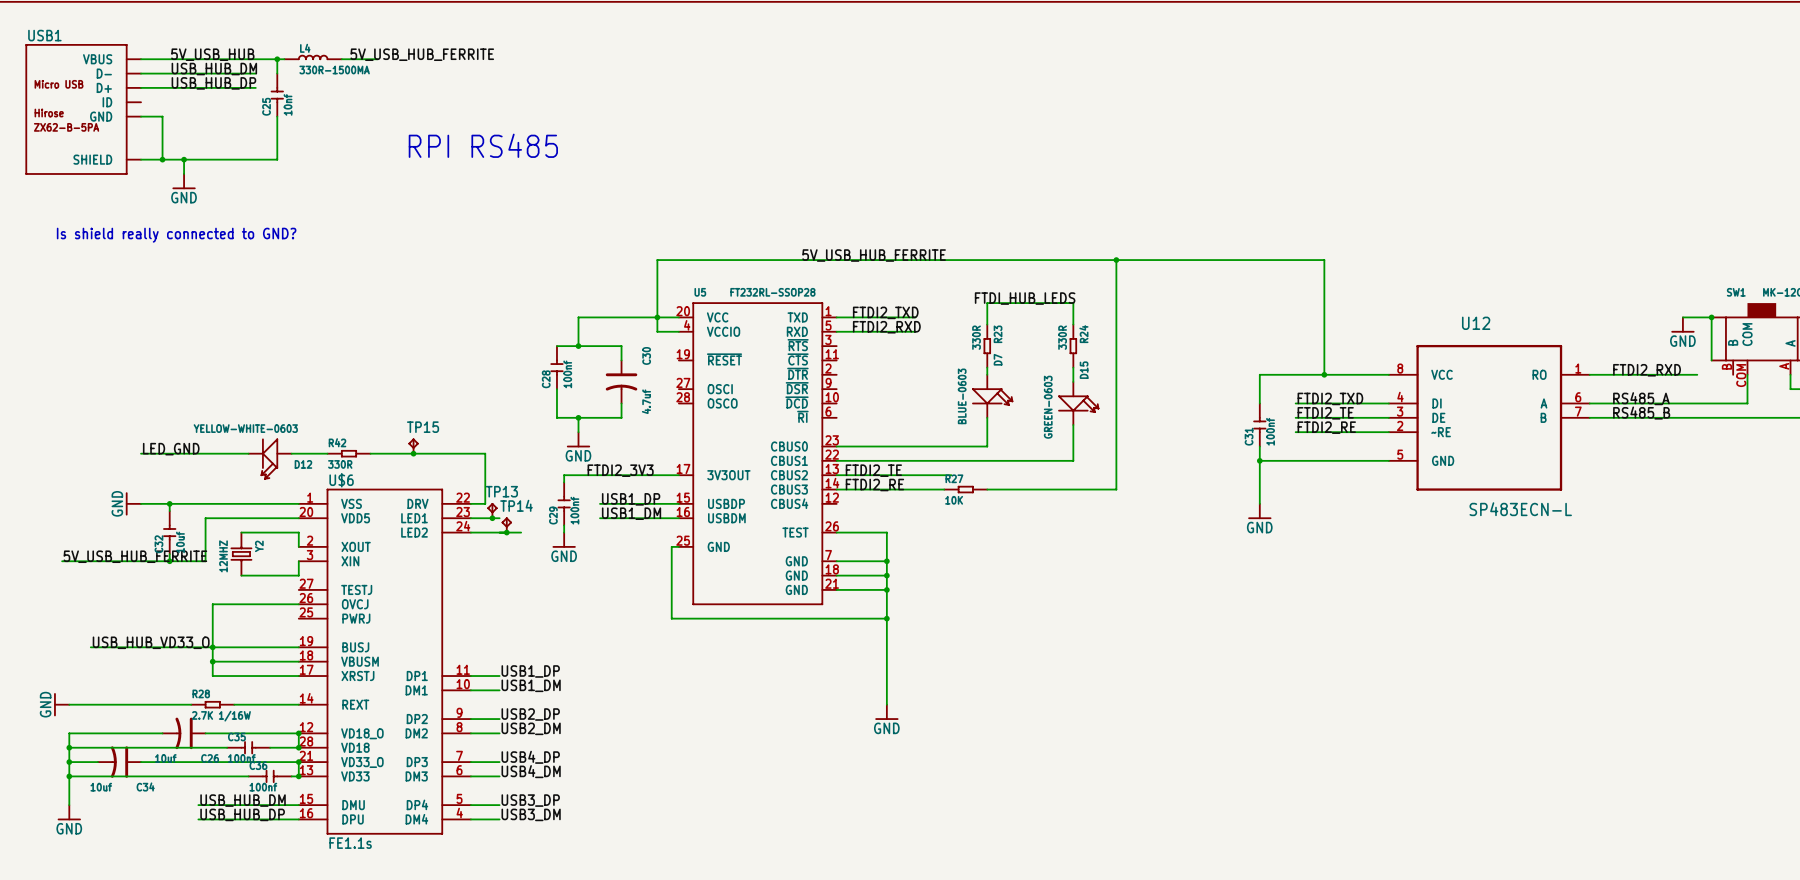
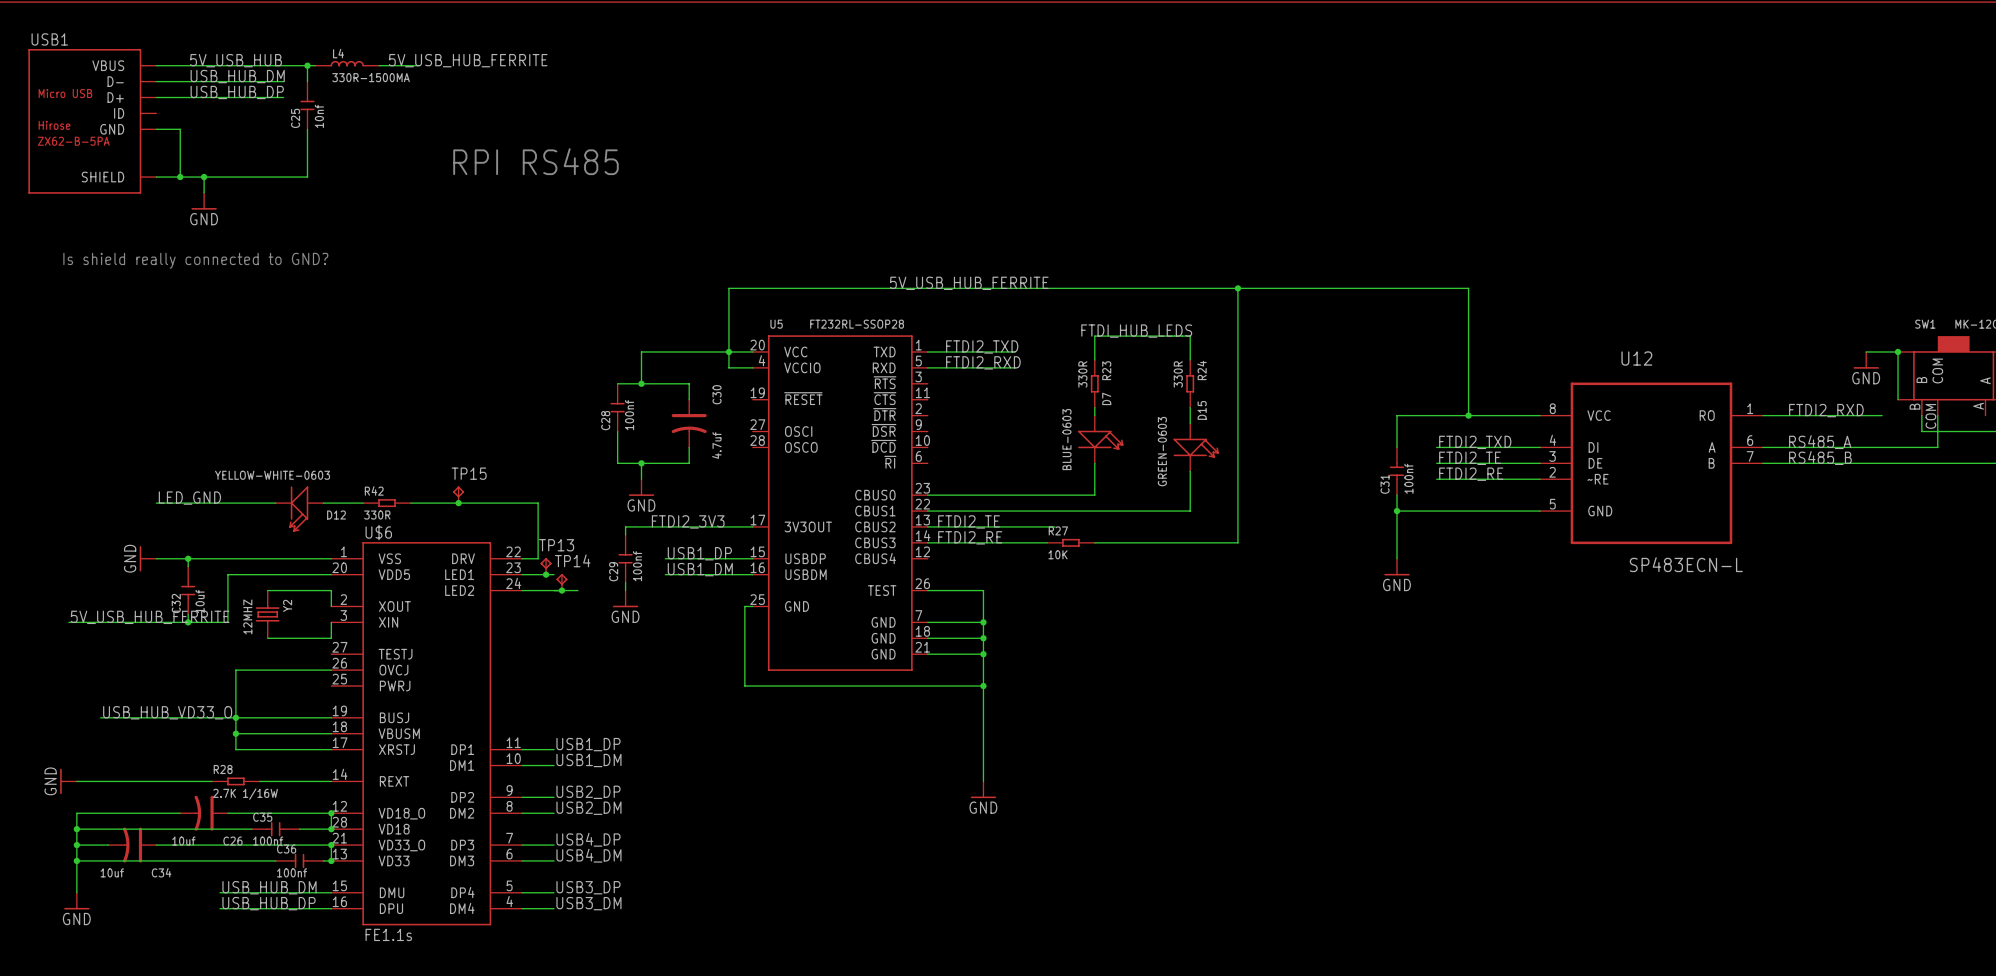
wire: (1790, 374) (1790, 389) -> (1921, 415) (1921, 431) (1985, 431)

